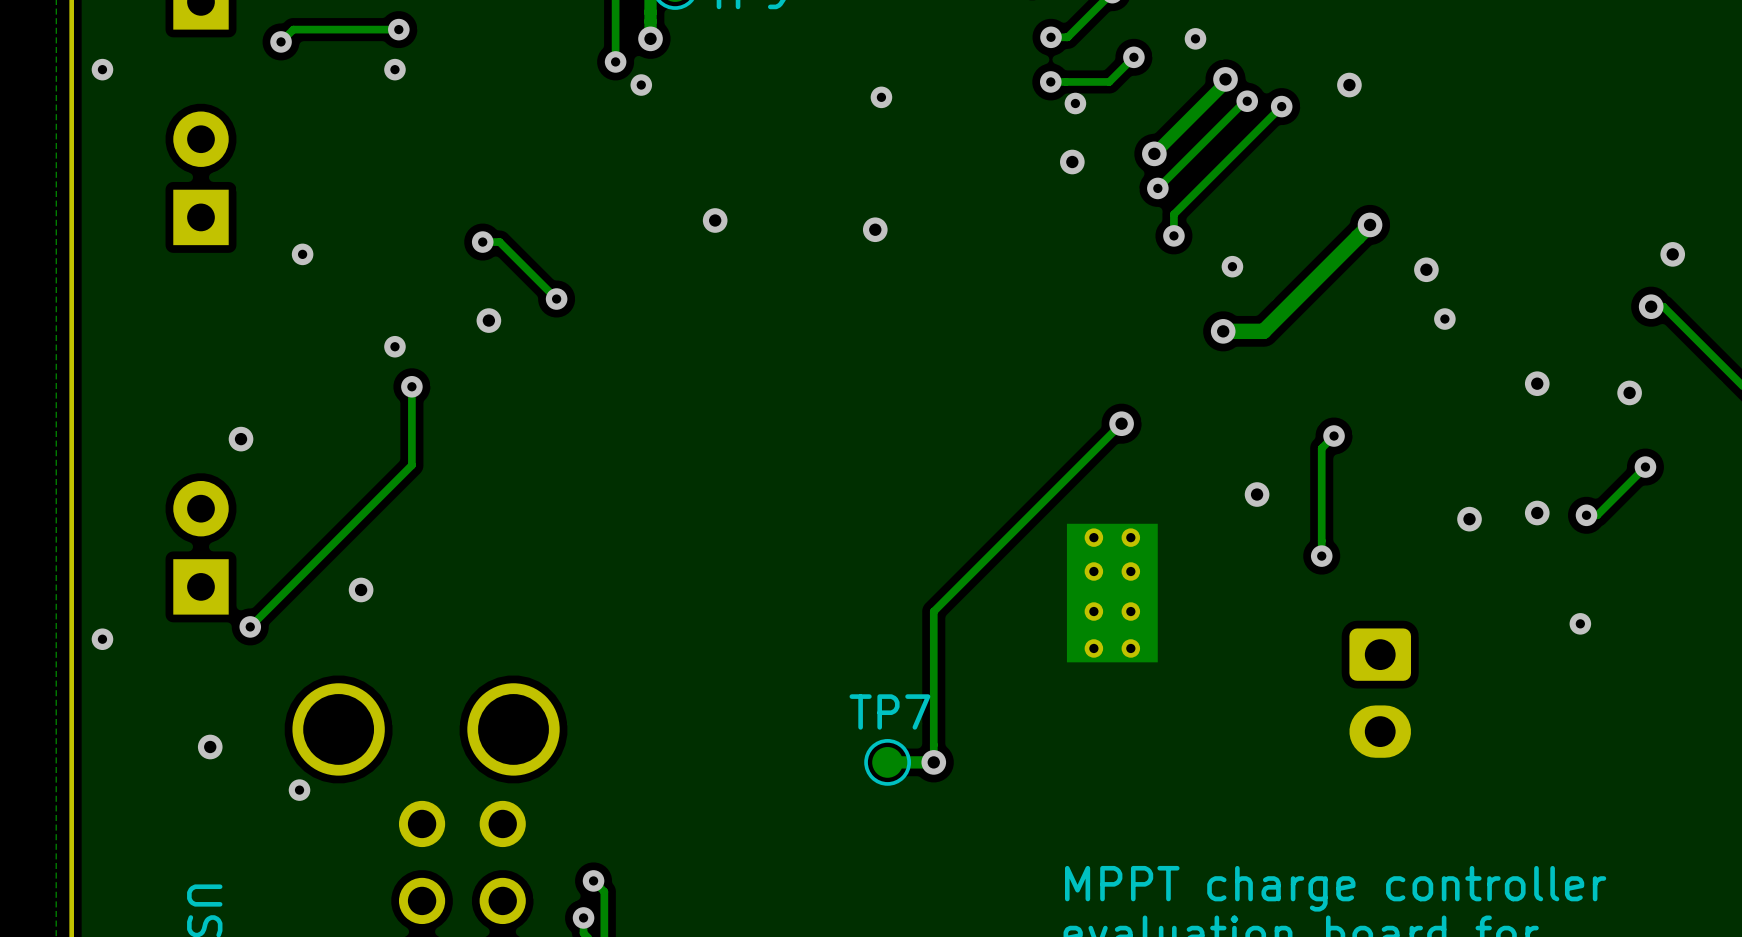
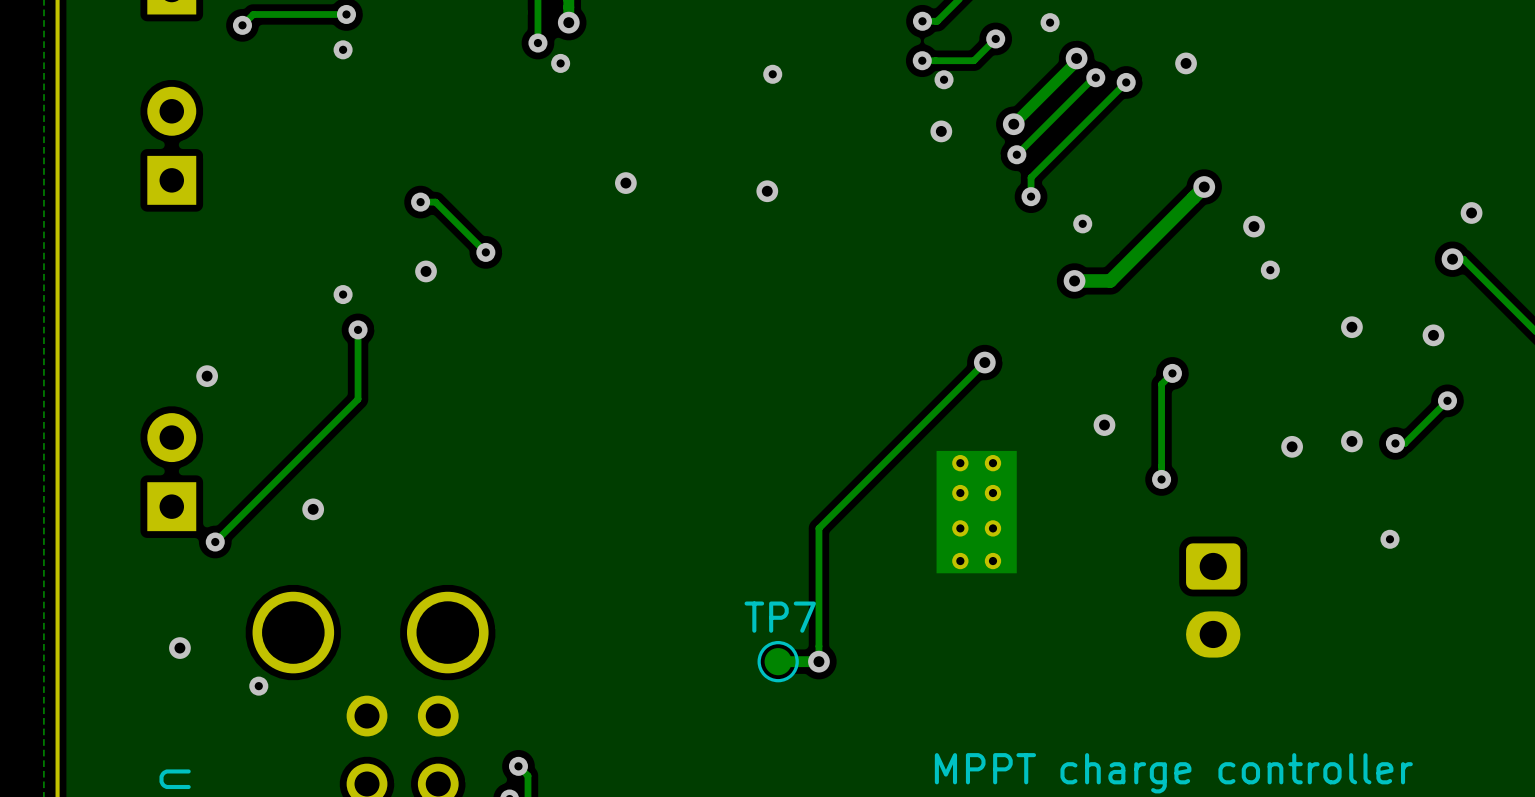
via: (102, 69) -> none
via: (302, 254) -> none
via: (102, 639) -> none

